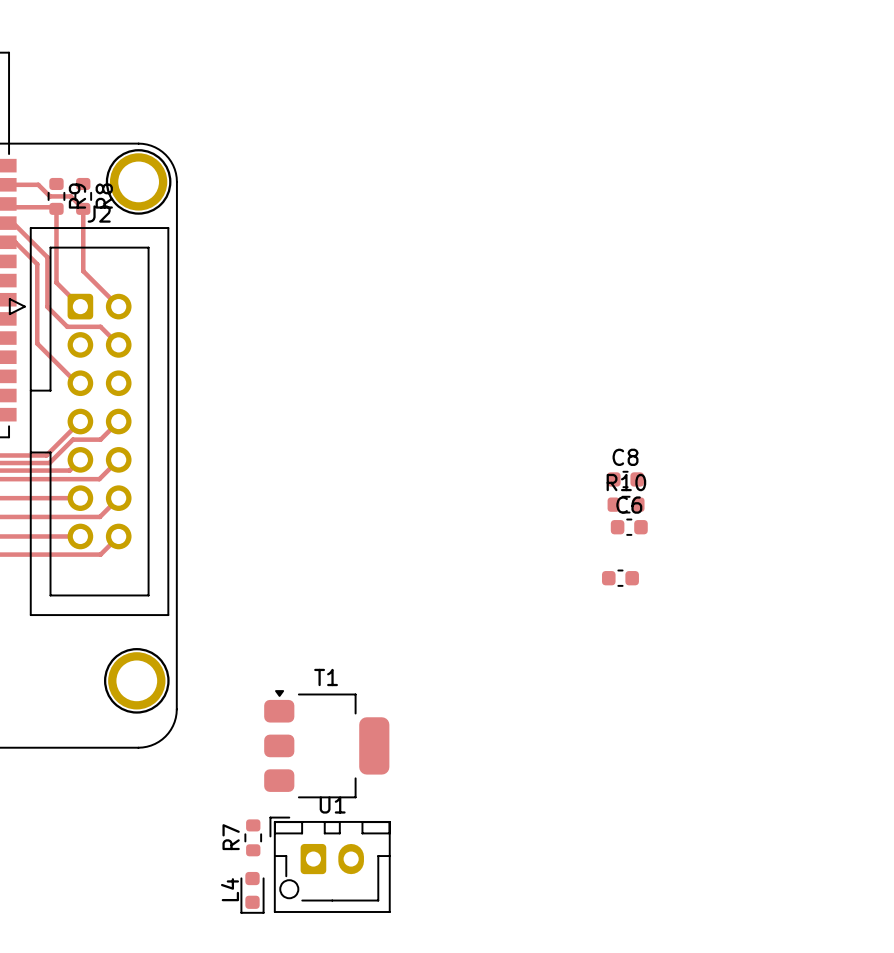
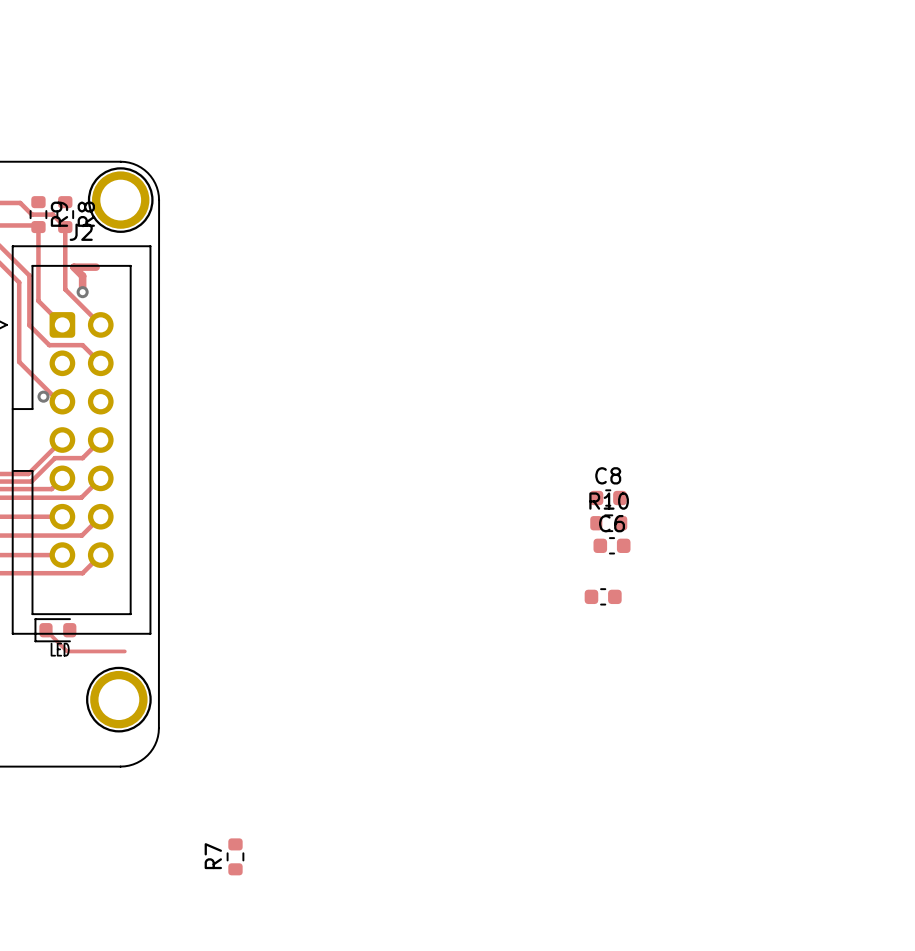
track: none -> (74, 267) (96, 267)
track: none -> (73, 267) (82, 276) (82, 292)
via: none -> (82, 292)
via: none -> (43, 396)
track: none -> (45, 630) (67, 651) (124, 651)
part: none -> LED (55, 630)
T1: (326, 744) -> none
U1: (330, 864) -> none
L4: (252, 892) -> none

